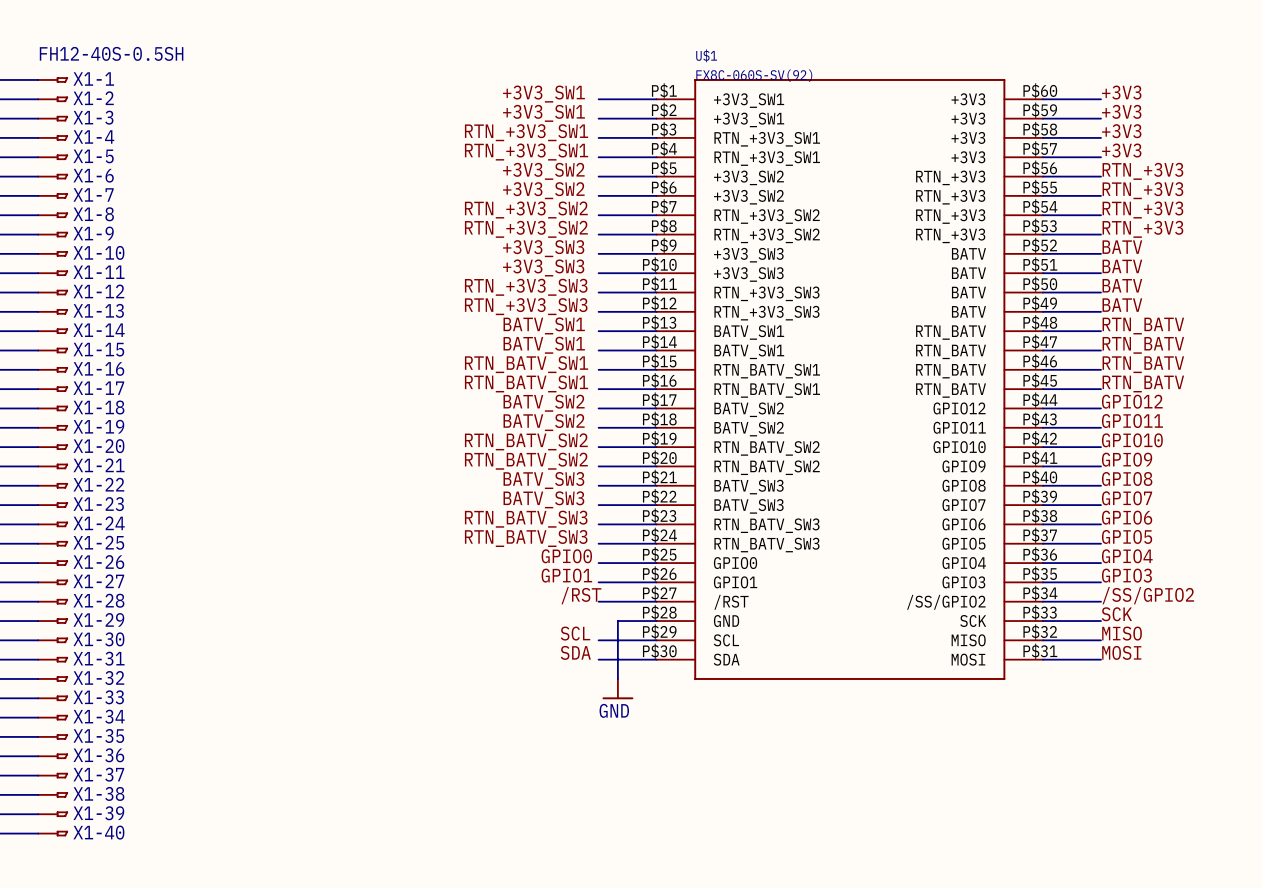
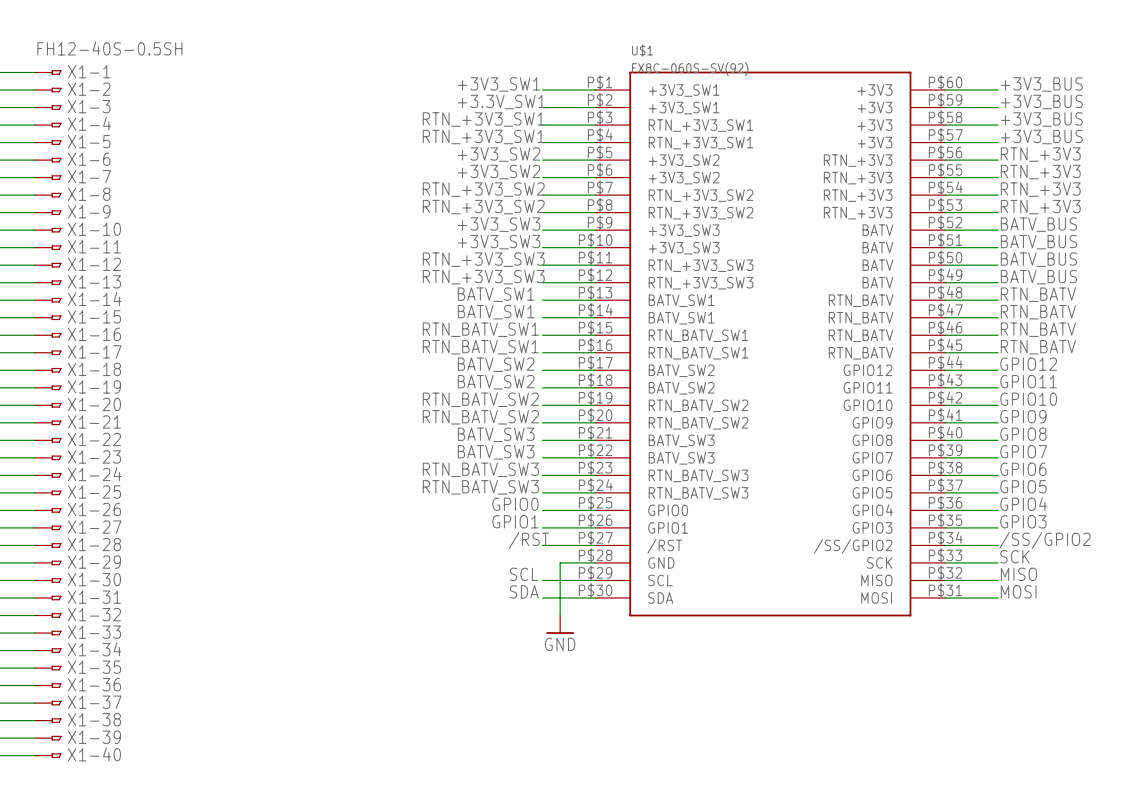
label: +3V3 (1121, 92) -> +3V3_BUS (1041, 84)
label: +3V3 (1121, 111) -> +3V3_BUS (1041, 101)
label: +3V3_SW1 (543, 113) -> +3.3V_SW1 (501, 101)
label: +3V3 (1121, 131) -> +3V3_BUS (1041, 119)
label: +3V3 (1121, 150) -> +3V3_BUS (1041, 137)
label: BATV (1122, 247) -> BATV_BUS (1038, 224)
label: BATV (1122, 266) -> BATV_BUS (1038, 242)
label: BATV (1122, 285) -> BATV_BUS (1038, 259)
label: BATV (1122, 305) -> BATV_BUS (1038, 277)

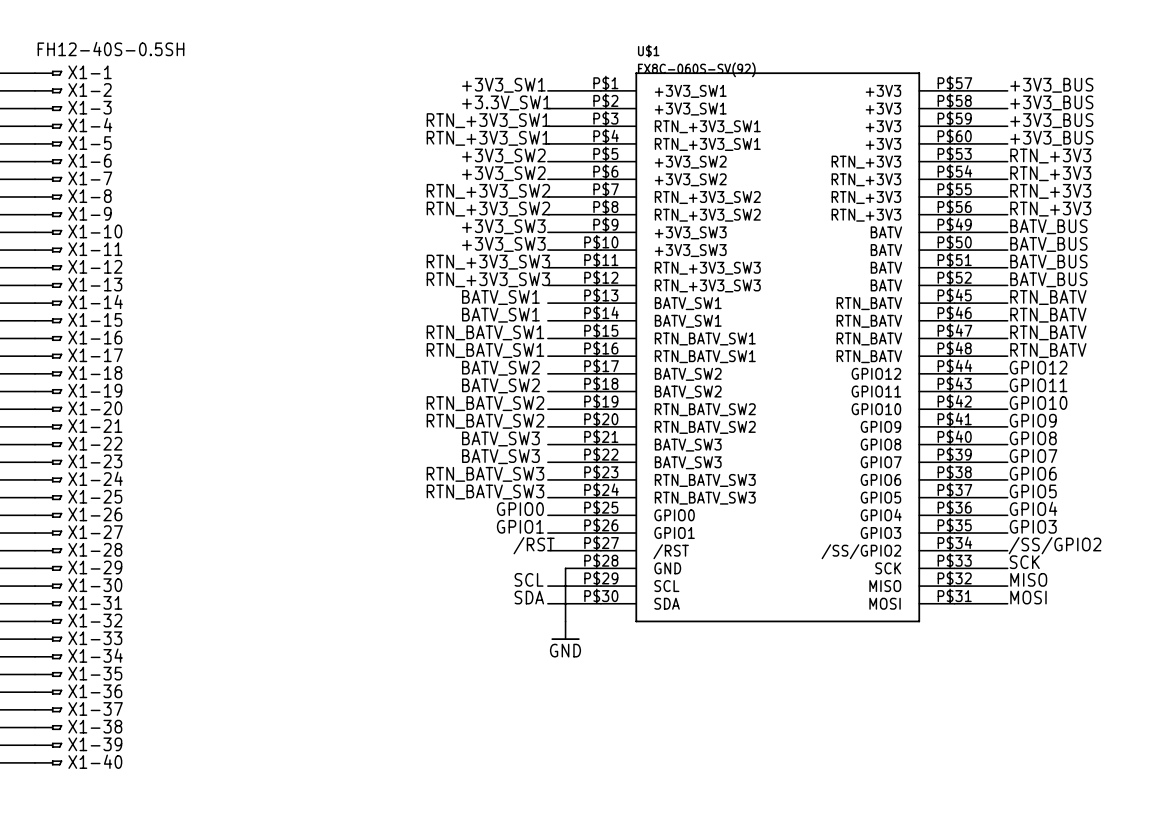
U$1 symbol: [595, 71, 946, 617] -> [600, 72, 955, 623]

